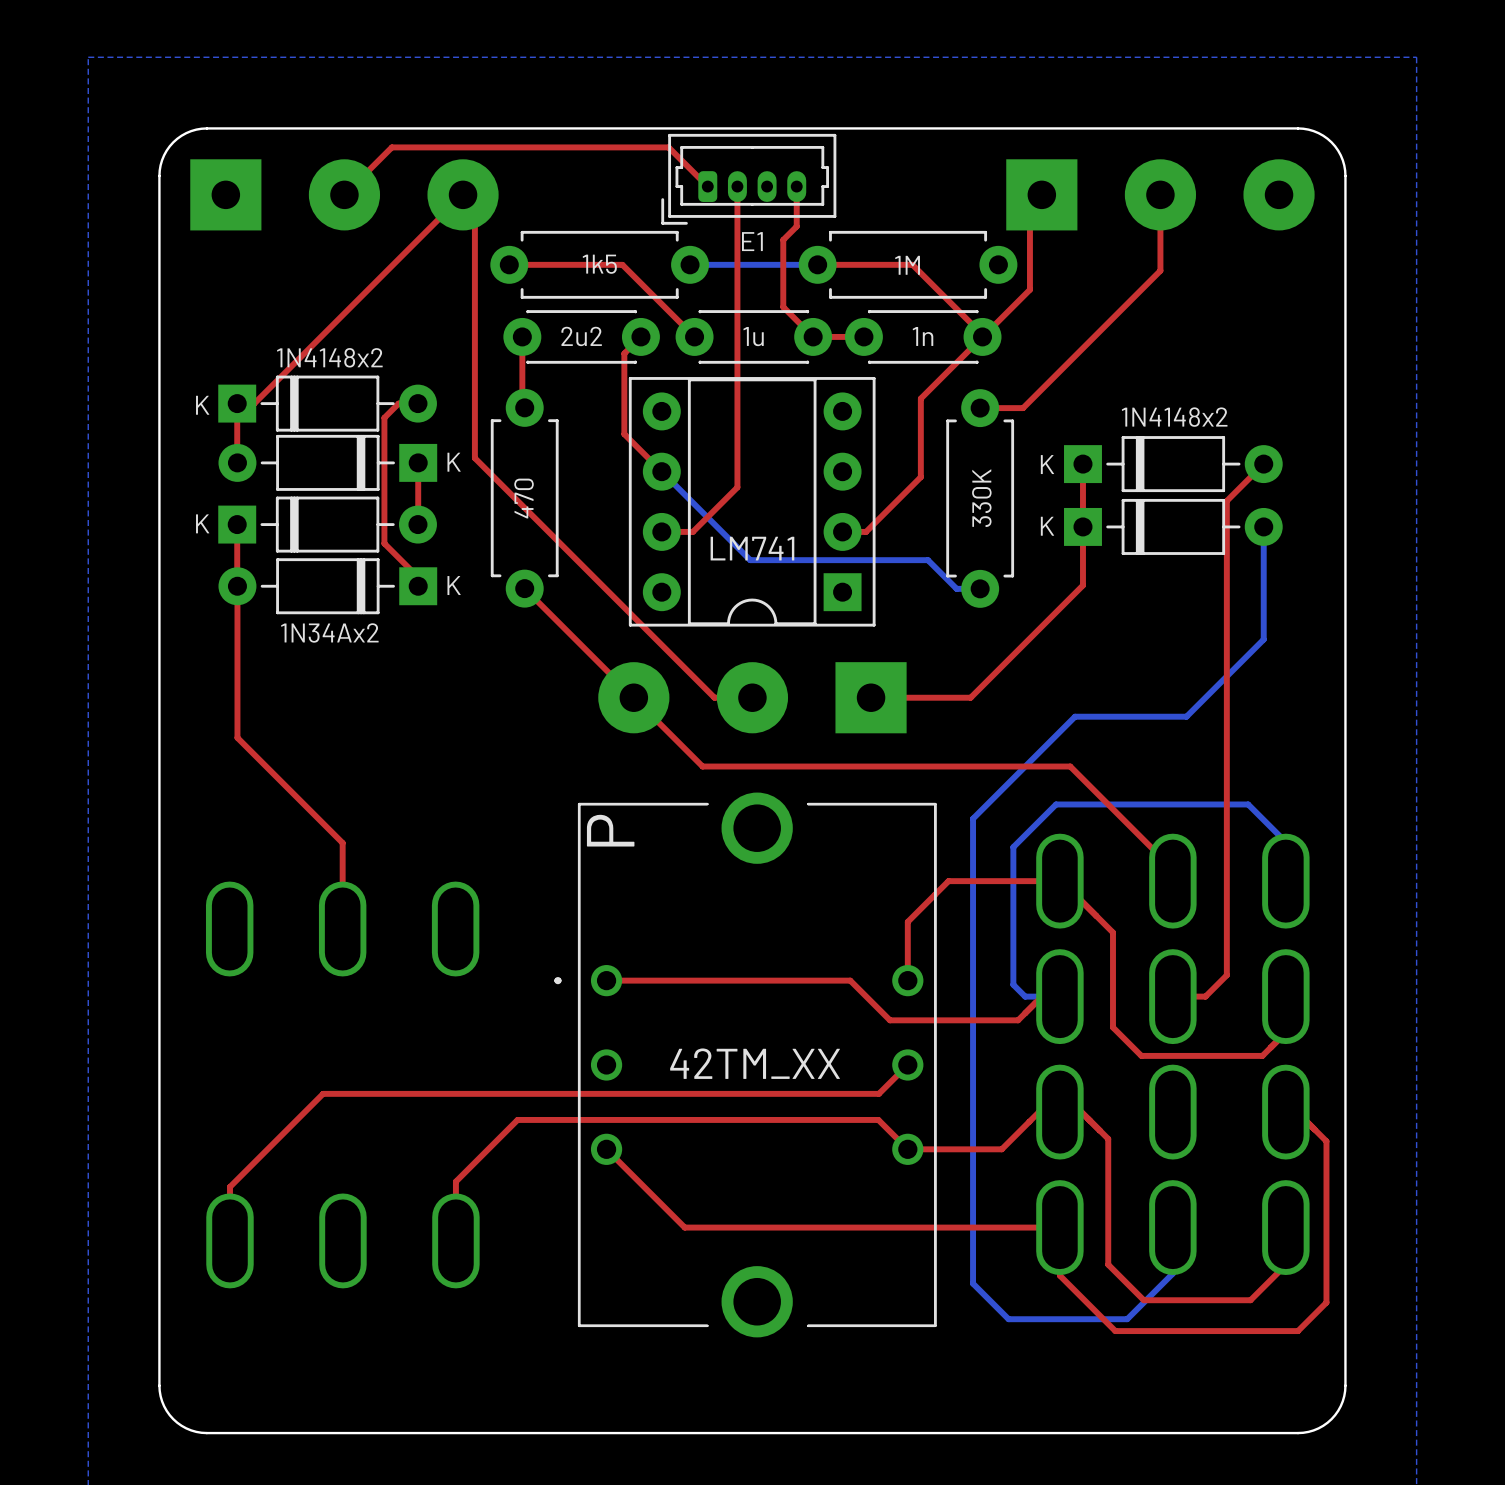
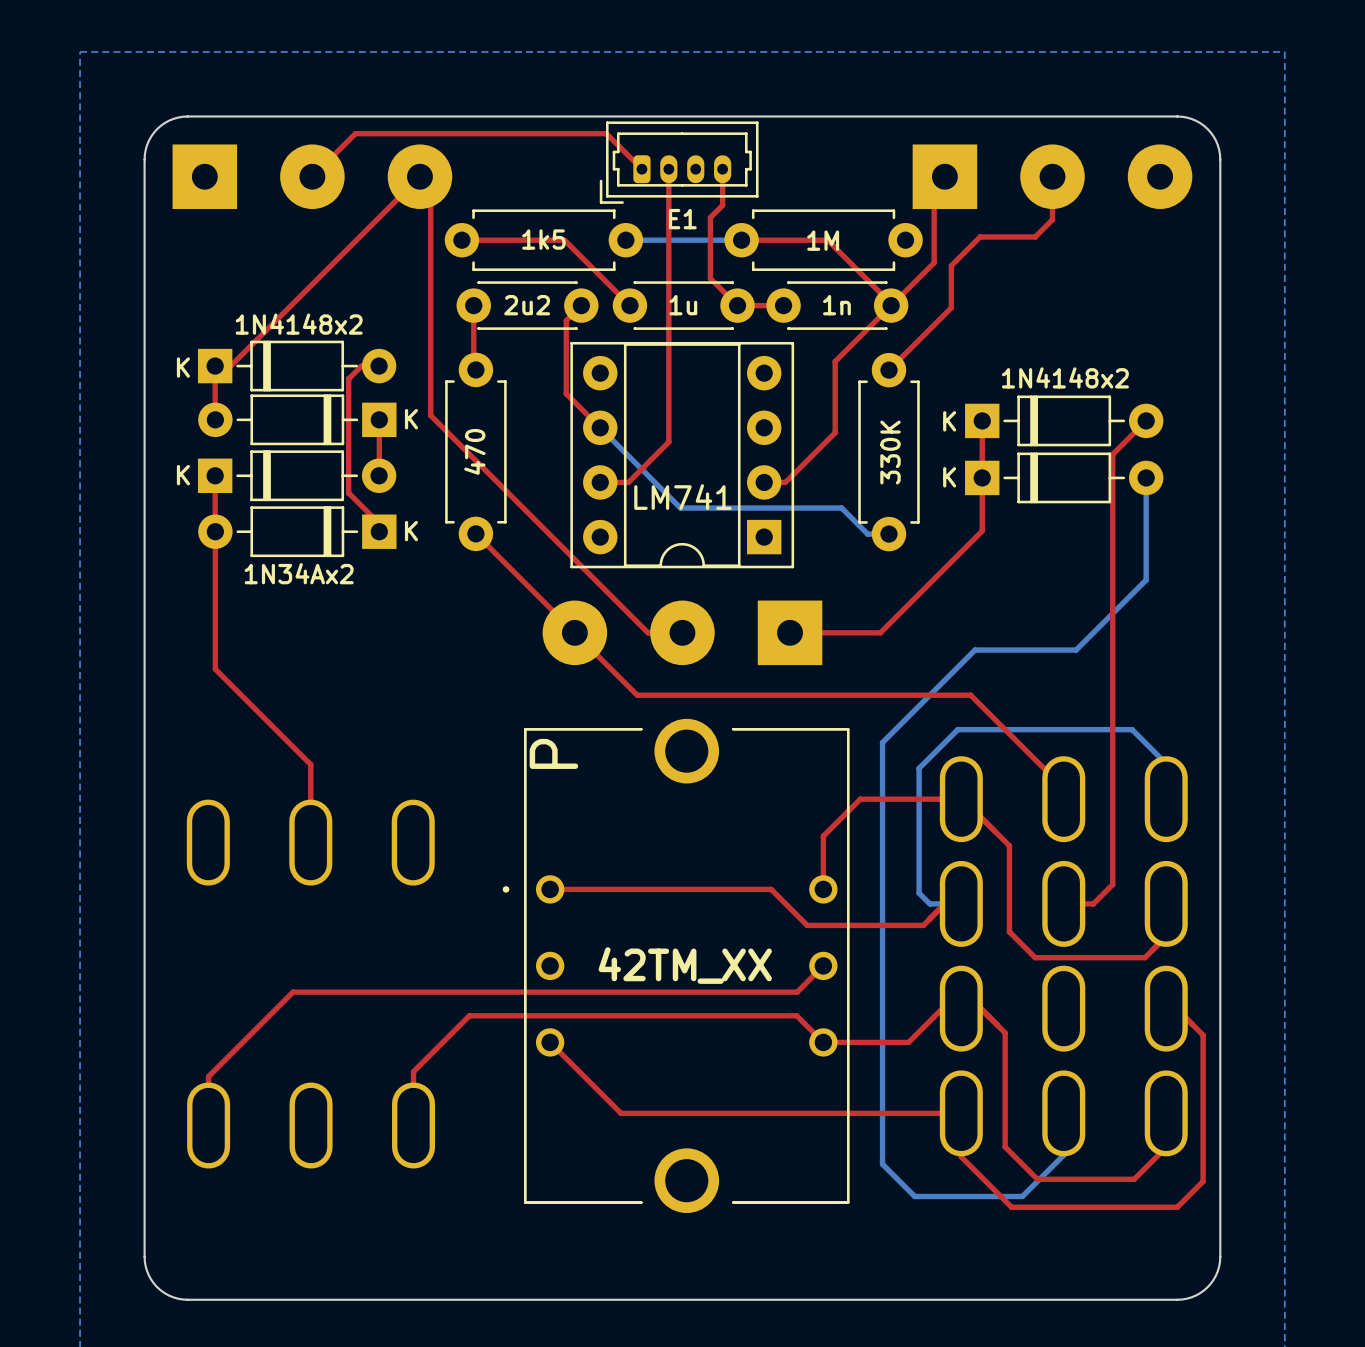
top track: (1160, 242) (1160, 270) (1023, 408) (980, 408) -> (1052, 219) (1035, 236) (980, 236) (951, 265) (951, 307) (888, 370)

